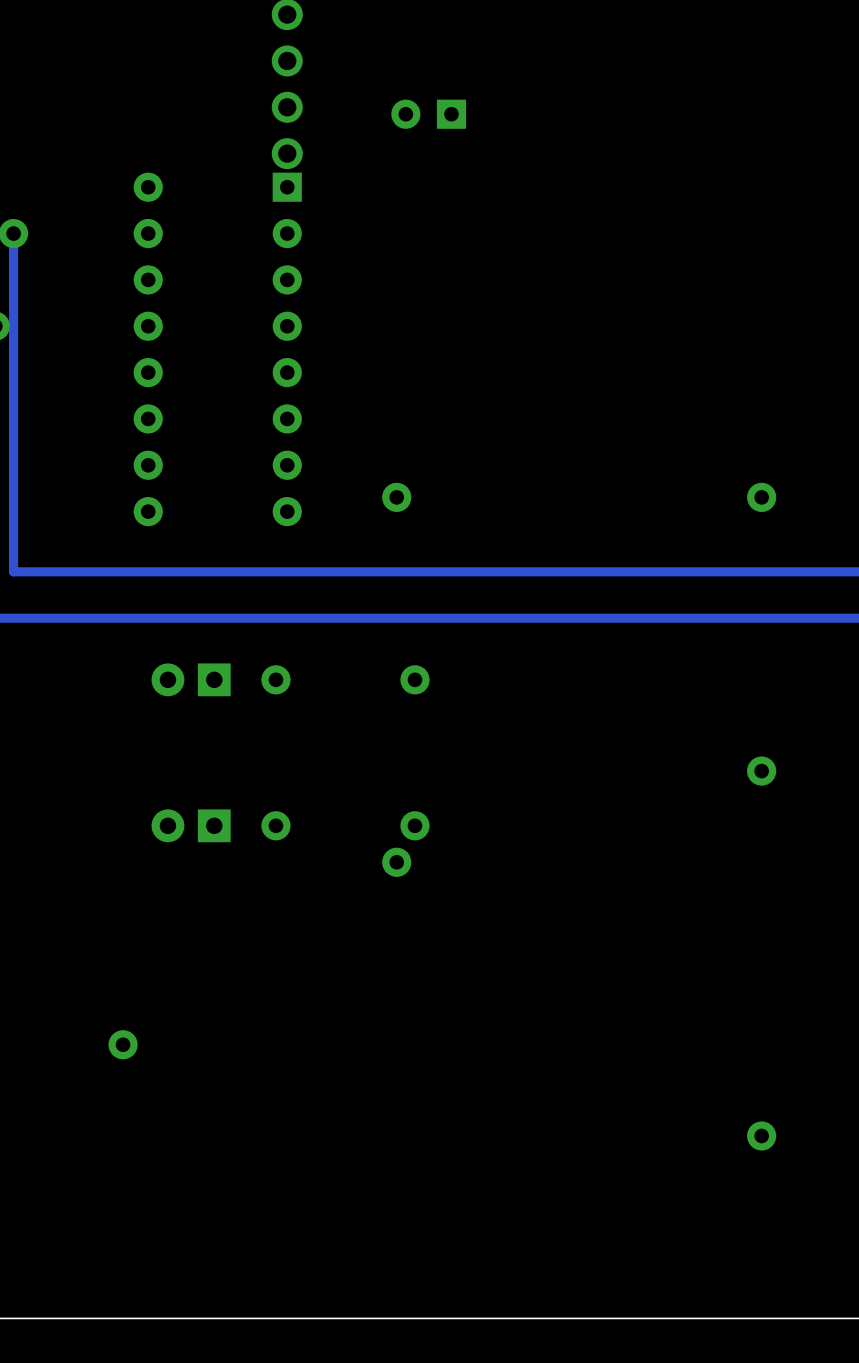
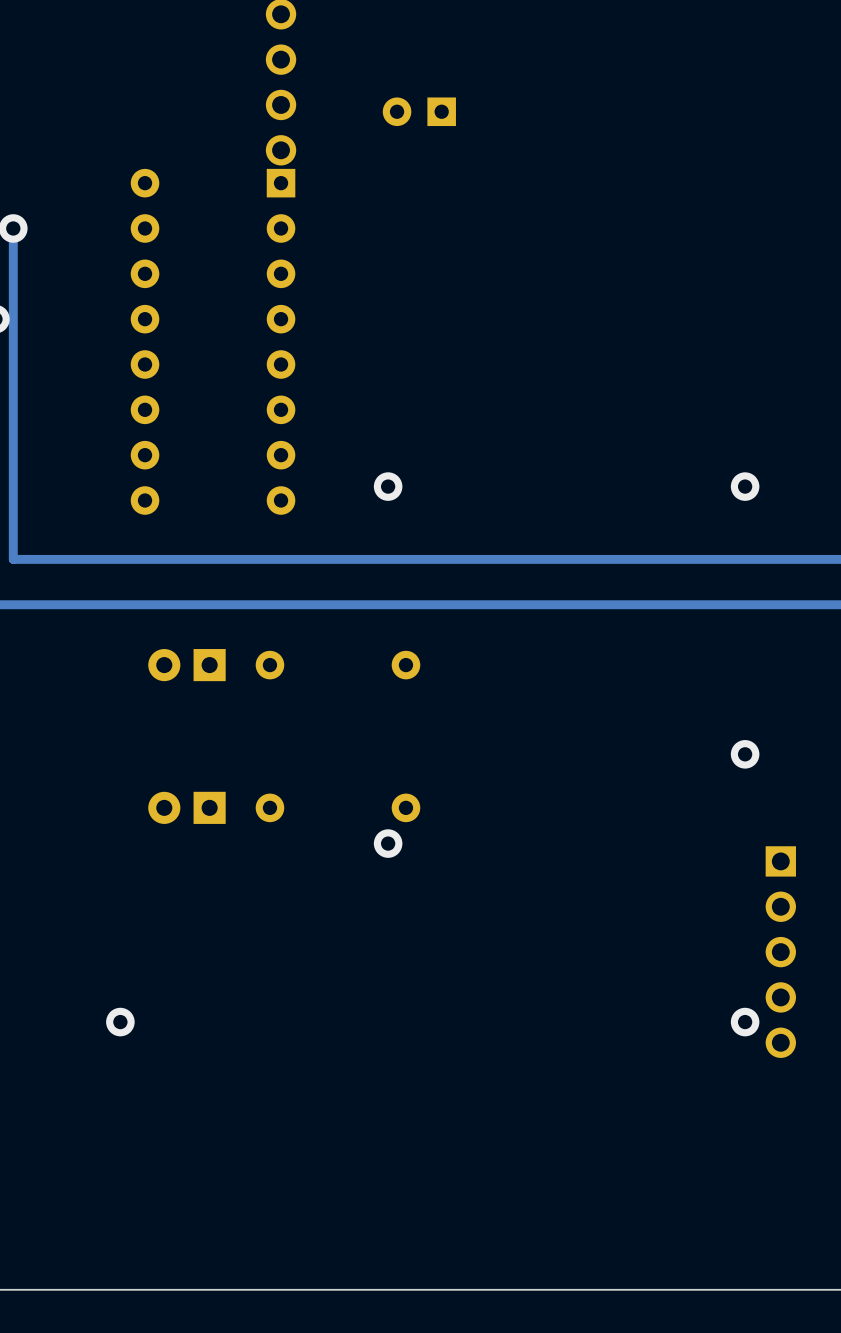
part: none -> (780, 952)
via position: (761, 1135) -> (745, 1022)

